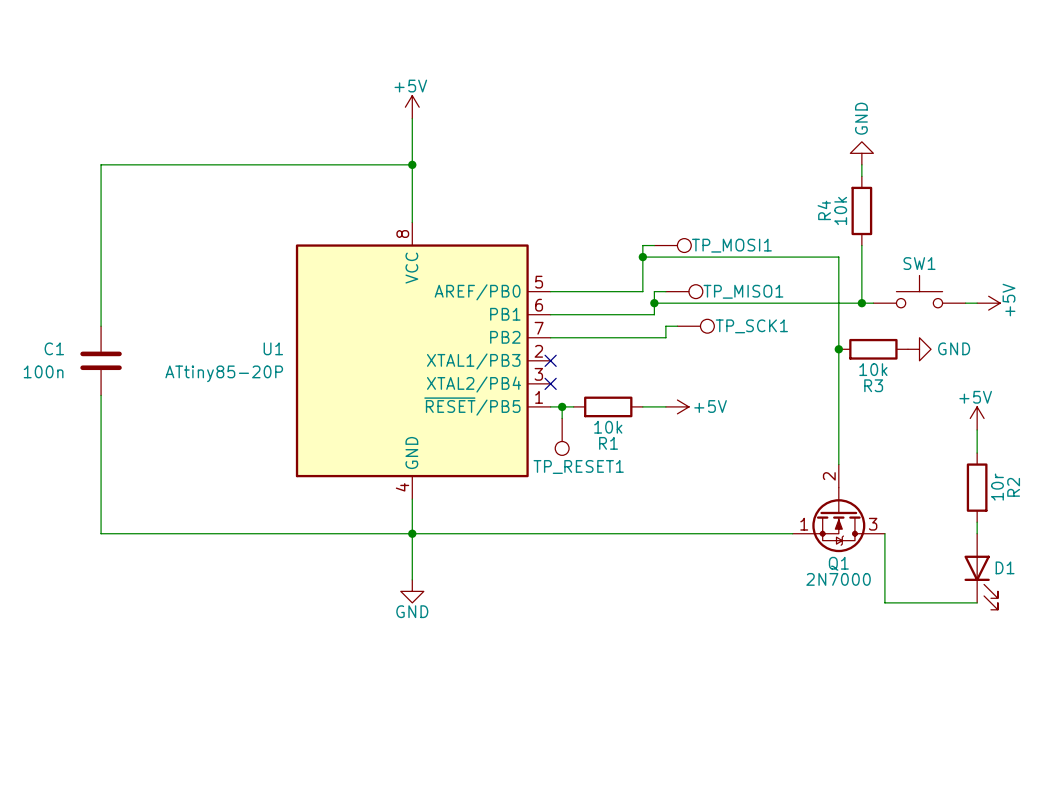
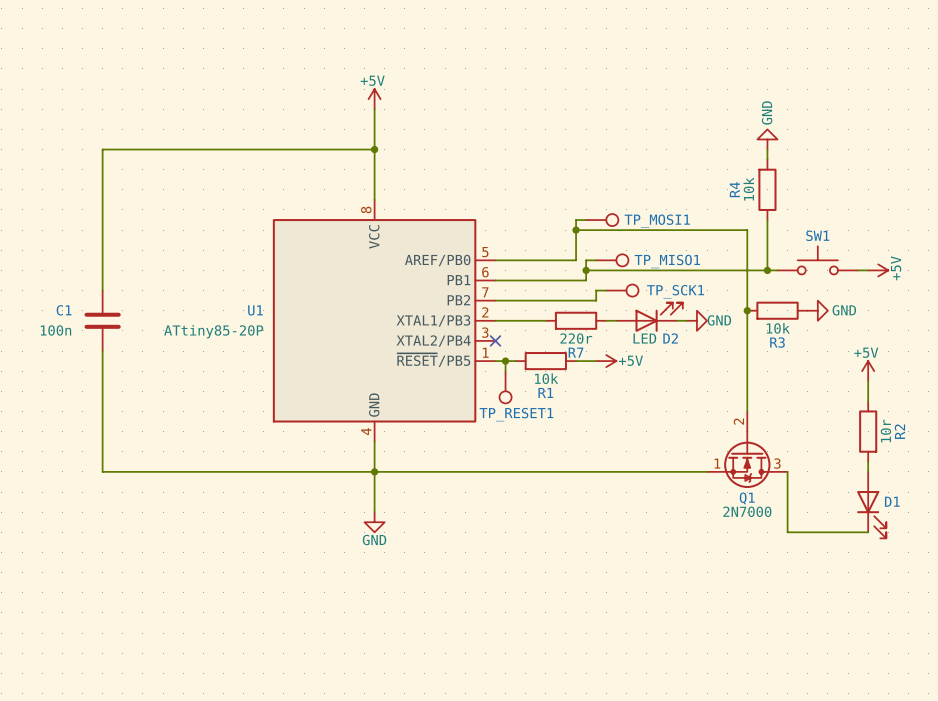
D2: none -> LED (649, 317)
wire: none -> (495, 320) (545, 320)
no-connect mark: (550, 360) -> none
R7: none -> 220r (576, 320)
wire: none -> (606, 320) (616, 320)
wire: none -> (676, 320) (686, 320)
power symbol: none -> GND (696, 320)

